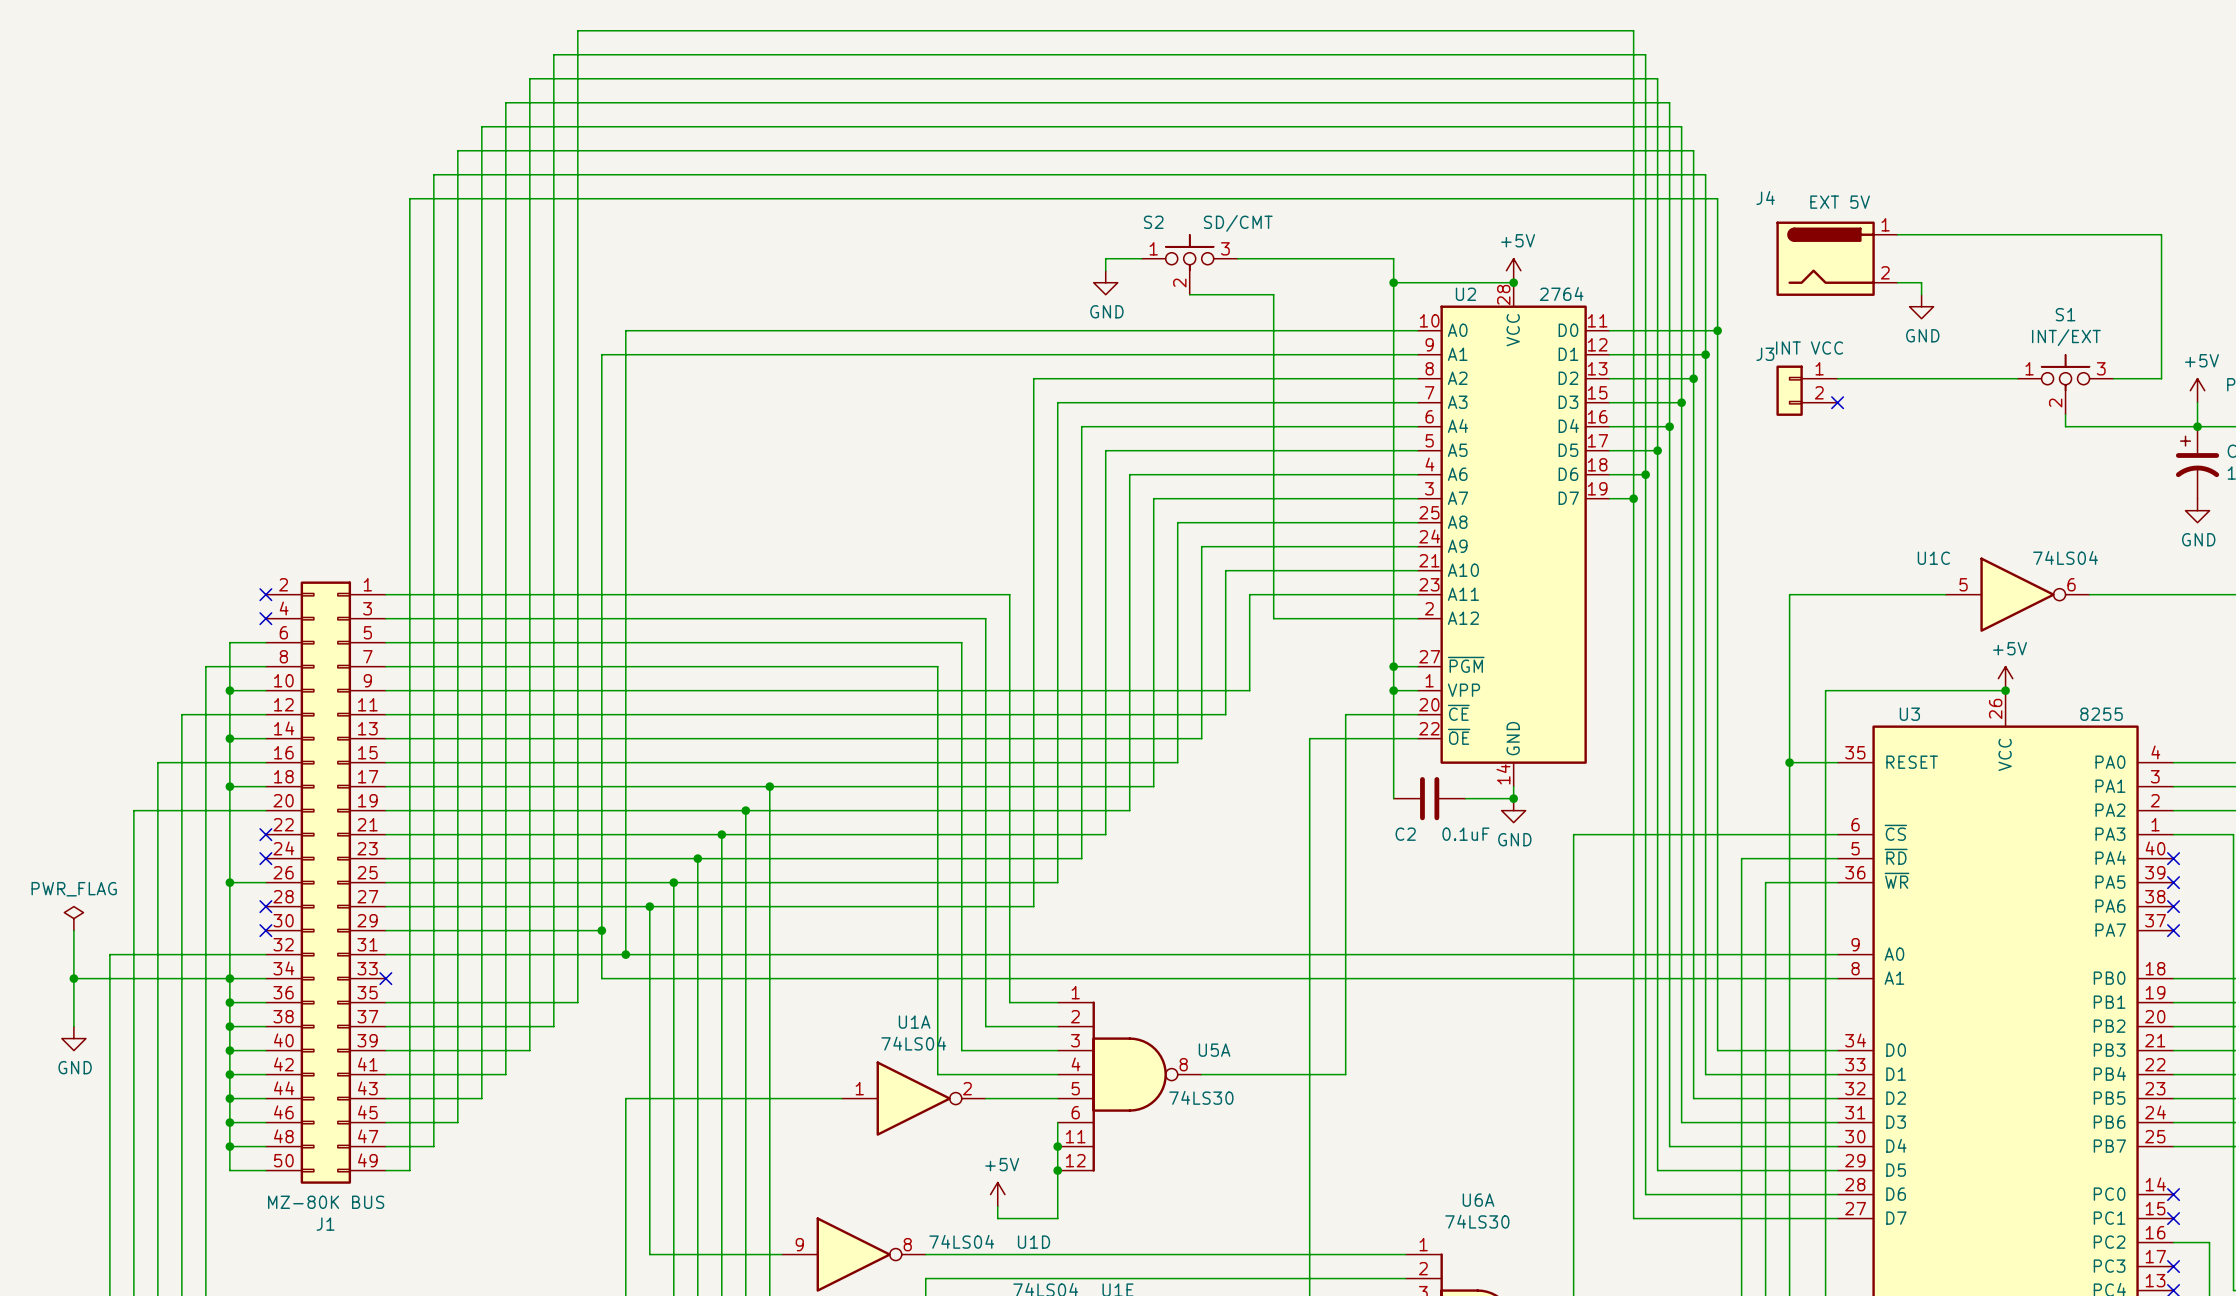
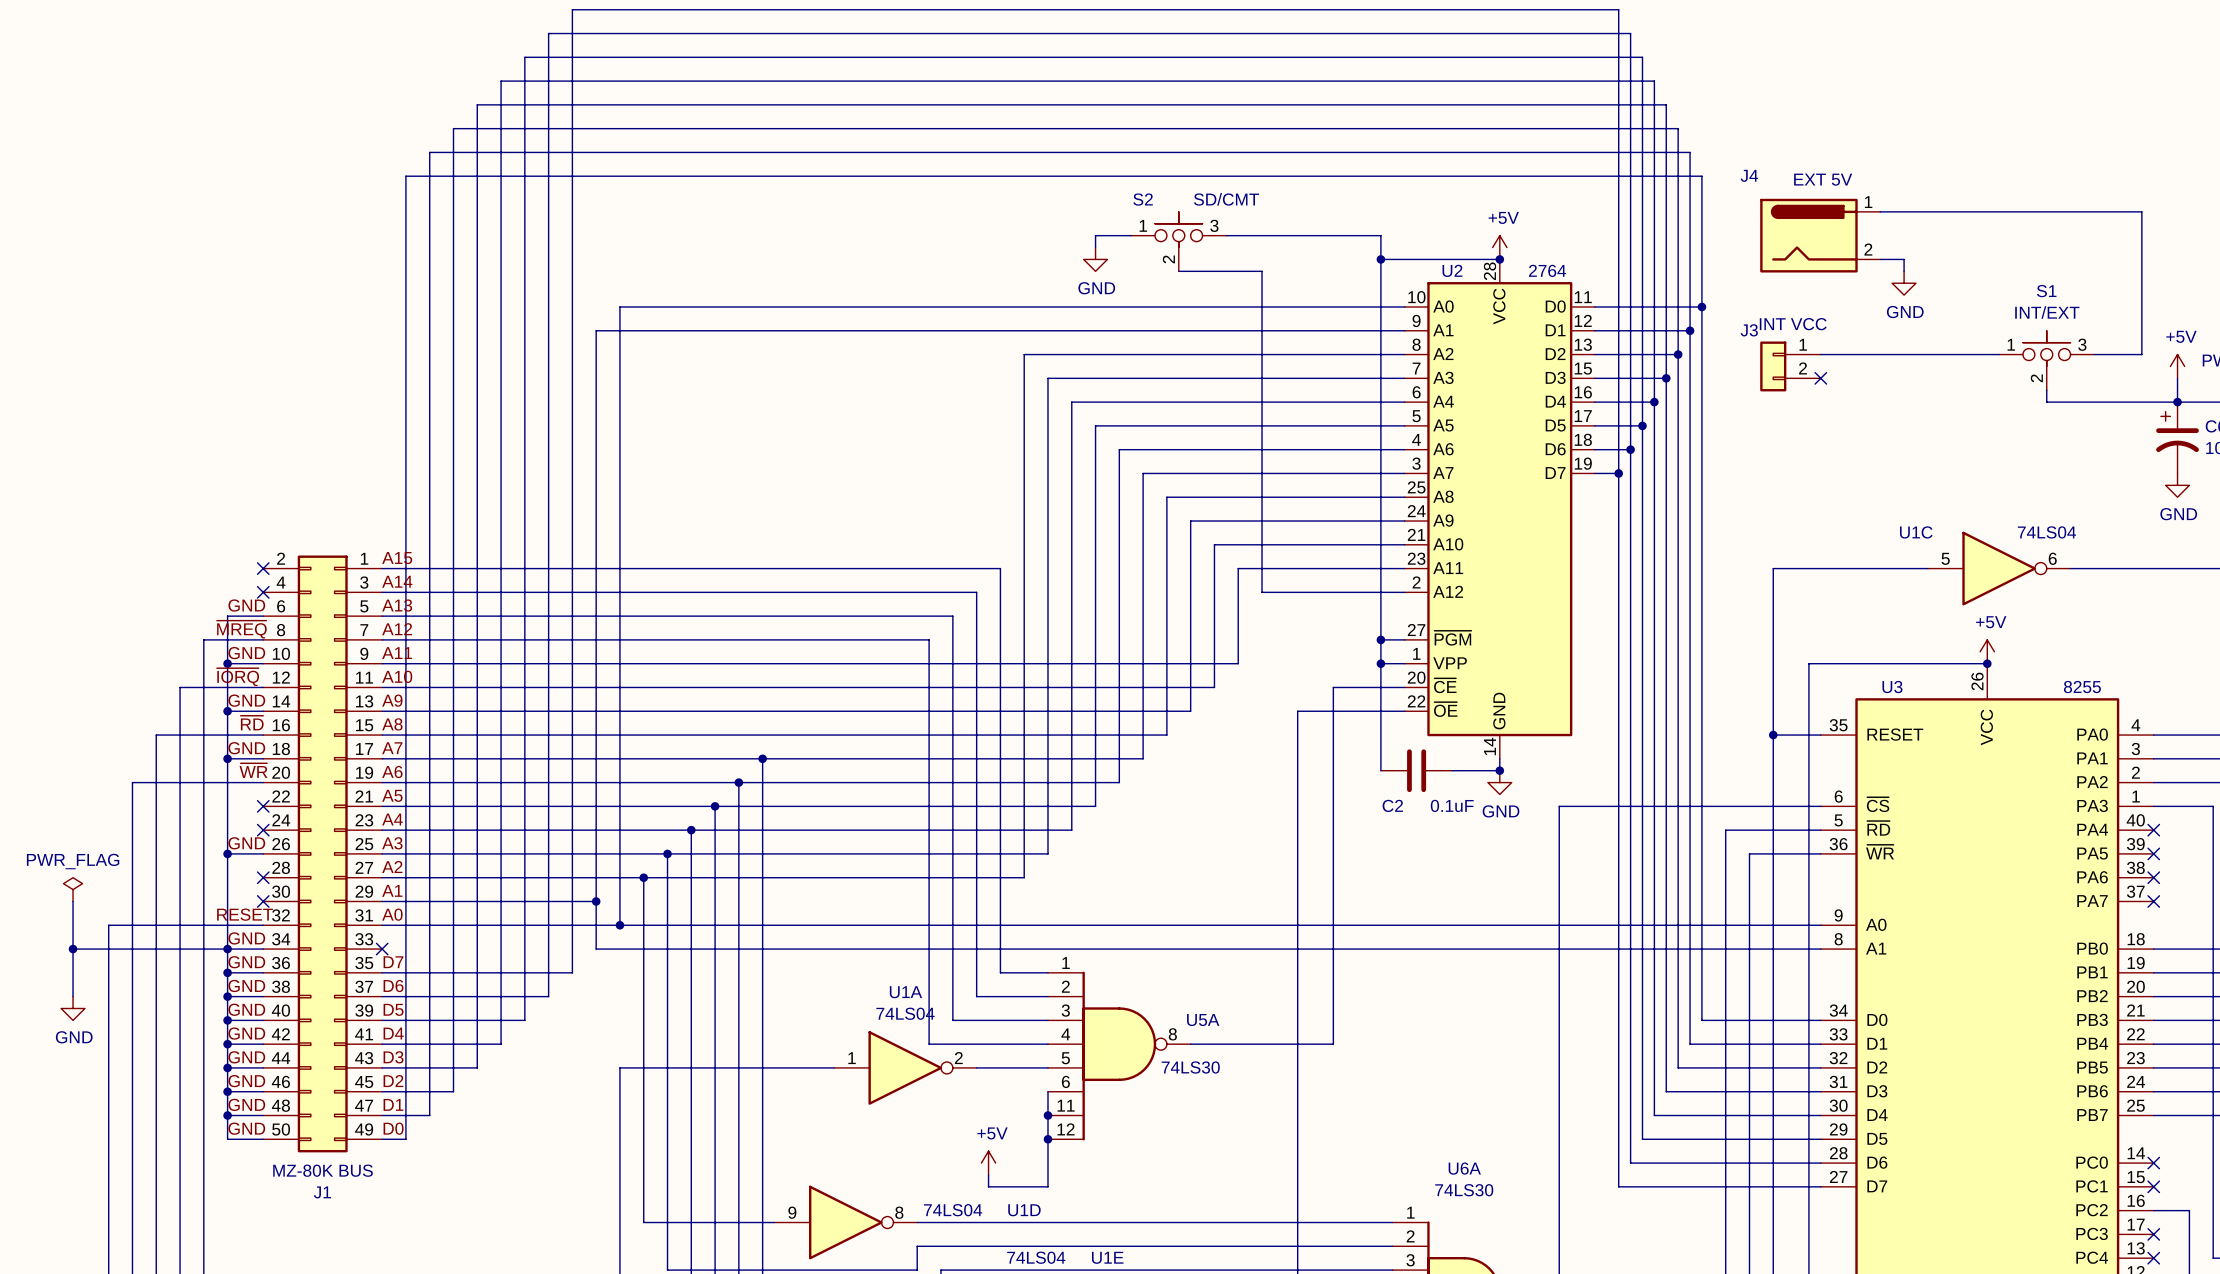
label: none -> A15 (397, 558)
label: none -> A14 (397, 581)
label: none -> GND (246, 605)
label: none -> A13 (397, 605)
label: none -> ~{MREQ} (241, 629)
label: none -> A12 (397, 629)
label: none -> GND (246, 653)
label: none -> A11 (397, 653)
label: none -> ~{IORQ} (237, 677)
label: none -> A10 (397, 676)
label: none -> GND (246, 700)
label: none -> A9 (392, 700)
label: none -> ~{RD} (252, 723)
label: none -> A8 (392, 724)
label: none -> GND (246, 748)
label: none -> A7 (392, 748)
label: none -> ~{WR} (253, 770)
label: none -> A6 (392, 771)
label: none -> A5 (392, 795)
label: none -> A4 (392, 819)
label: none -> GND (246, 843)
label: none -> A3 (392, 843)
label: none -> A2 (392, 867)
label: none -> A1 (392, 890)
label: none -> RESET (245, 914)
label: none -> A0 (392, 914)
label: none -> GND (246, 938)
label: none -> GND (246, 962)
label: none -> D7 (393, 962)
label: none -> GND (246, 985)
label: none -> D6 (393, 985)
label: none -> GND (246, 1009)
label: none -> D5 (393, 1009)
label: none -> GND (246, 1033)
label: none -> D4 (393, 1033)
label: none -> GND (246, 1057)
label: none -> D3 (393, 1057)
label: none -> GND (246, 1081)
label: none -> D2 (393, 1081)
label: none -> GND (246, 1104)
label: none -> D1 (393, 1104)
label: none -> GND (246, 1128)
label: none -> D0 (393, 1128)

